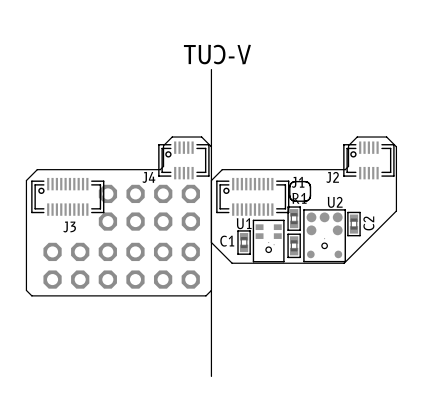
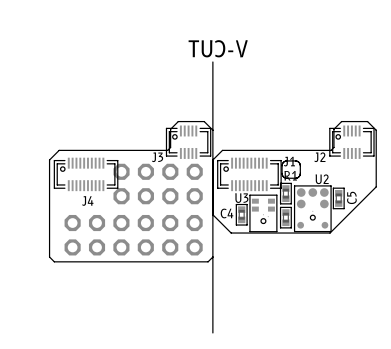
J4 name: J4 (148, 177) -> J3 (157, 157)
U1 name: U1 (244, 223) -> U3 (241, 198)
C2 name: C2 (368, 223) -> C5 (351, 197)
J3 name: J3 (69, 226) -> J4 (87, 200)
C1 name: C1 (227, 241) -> C4 (227, 213)

